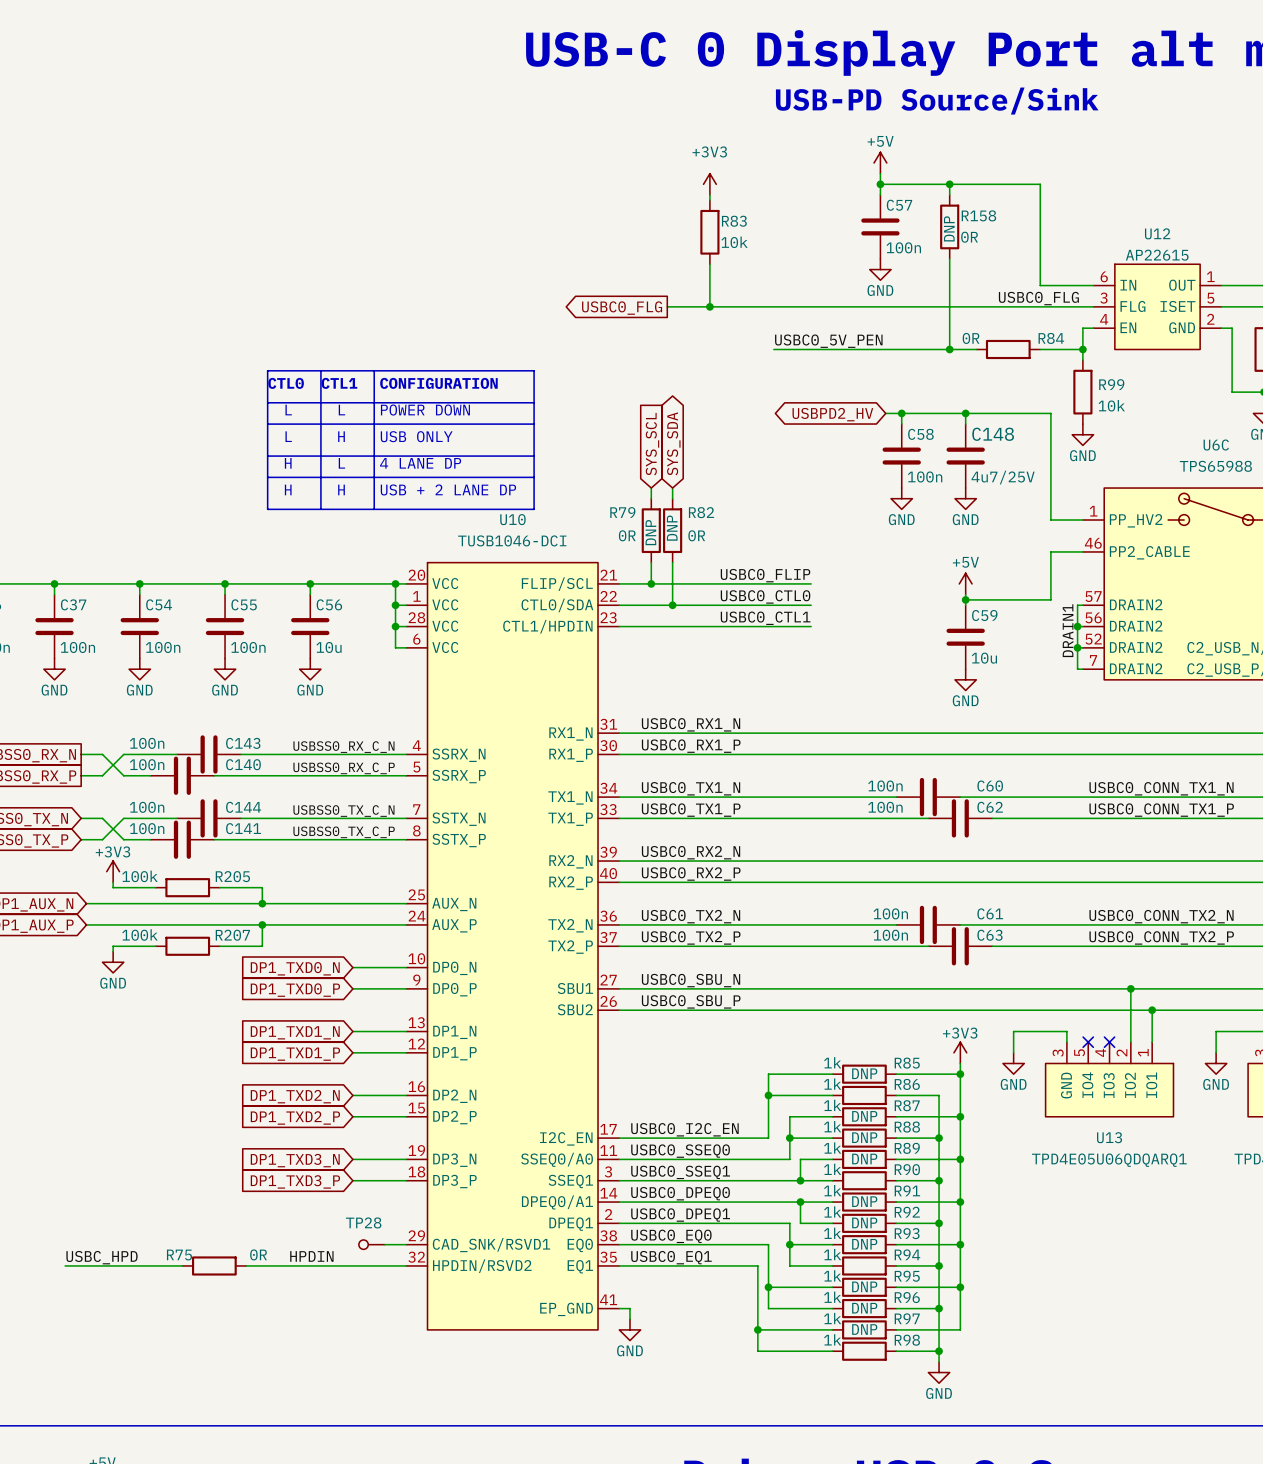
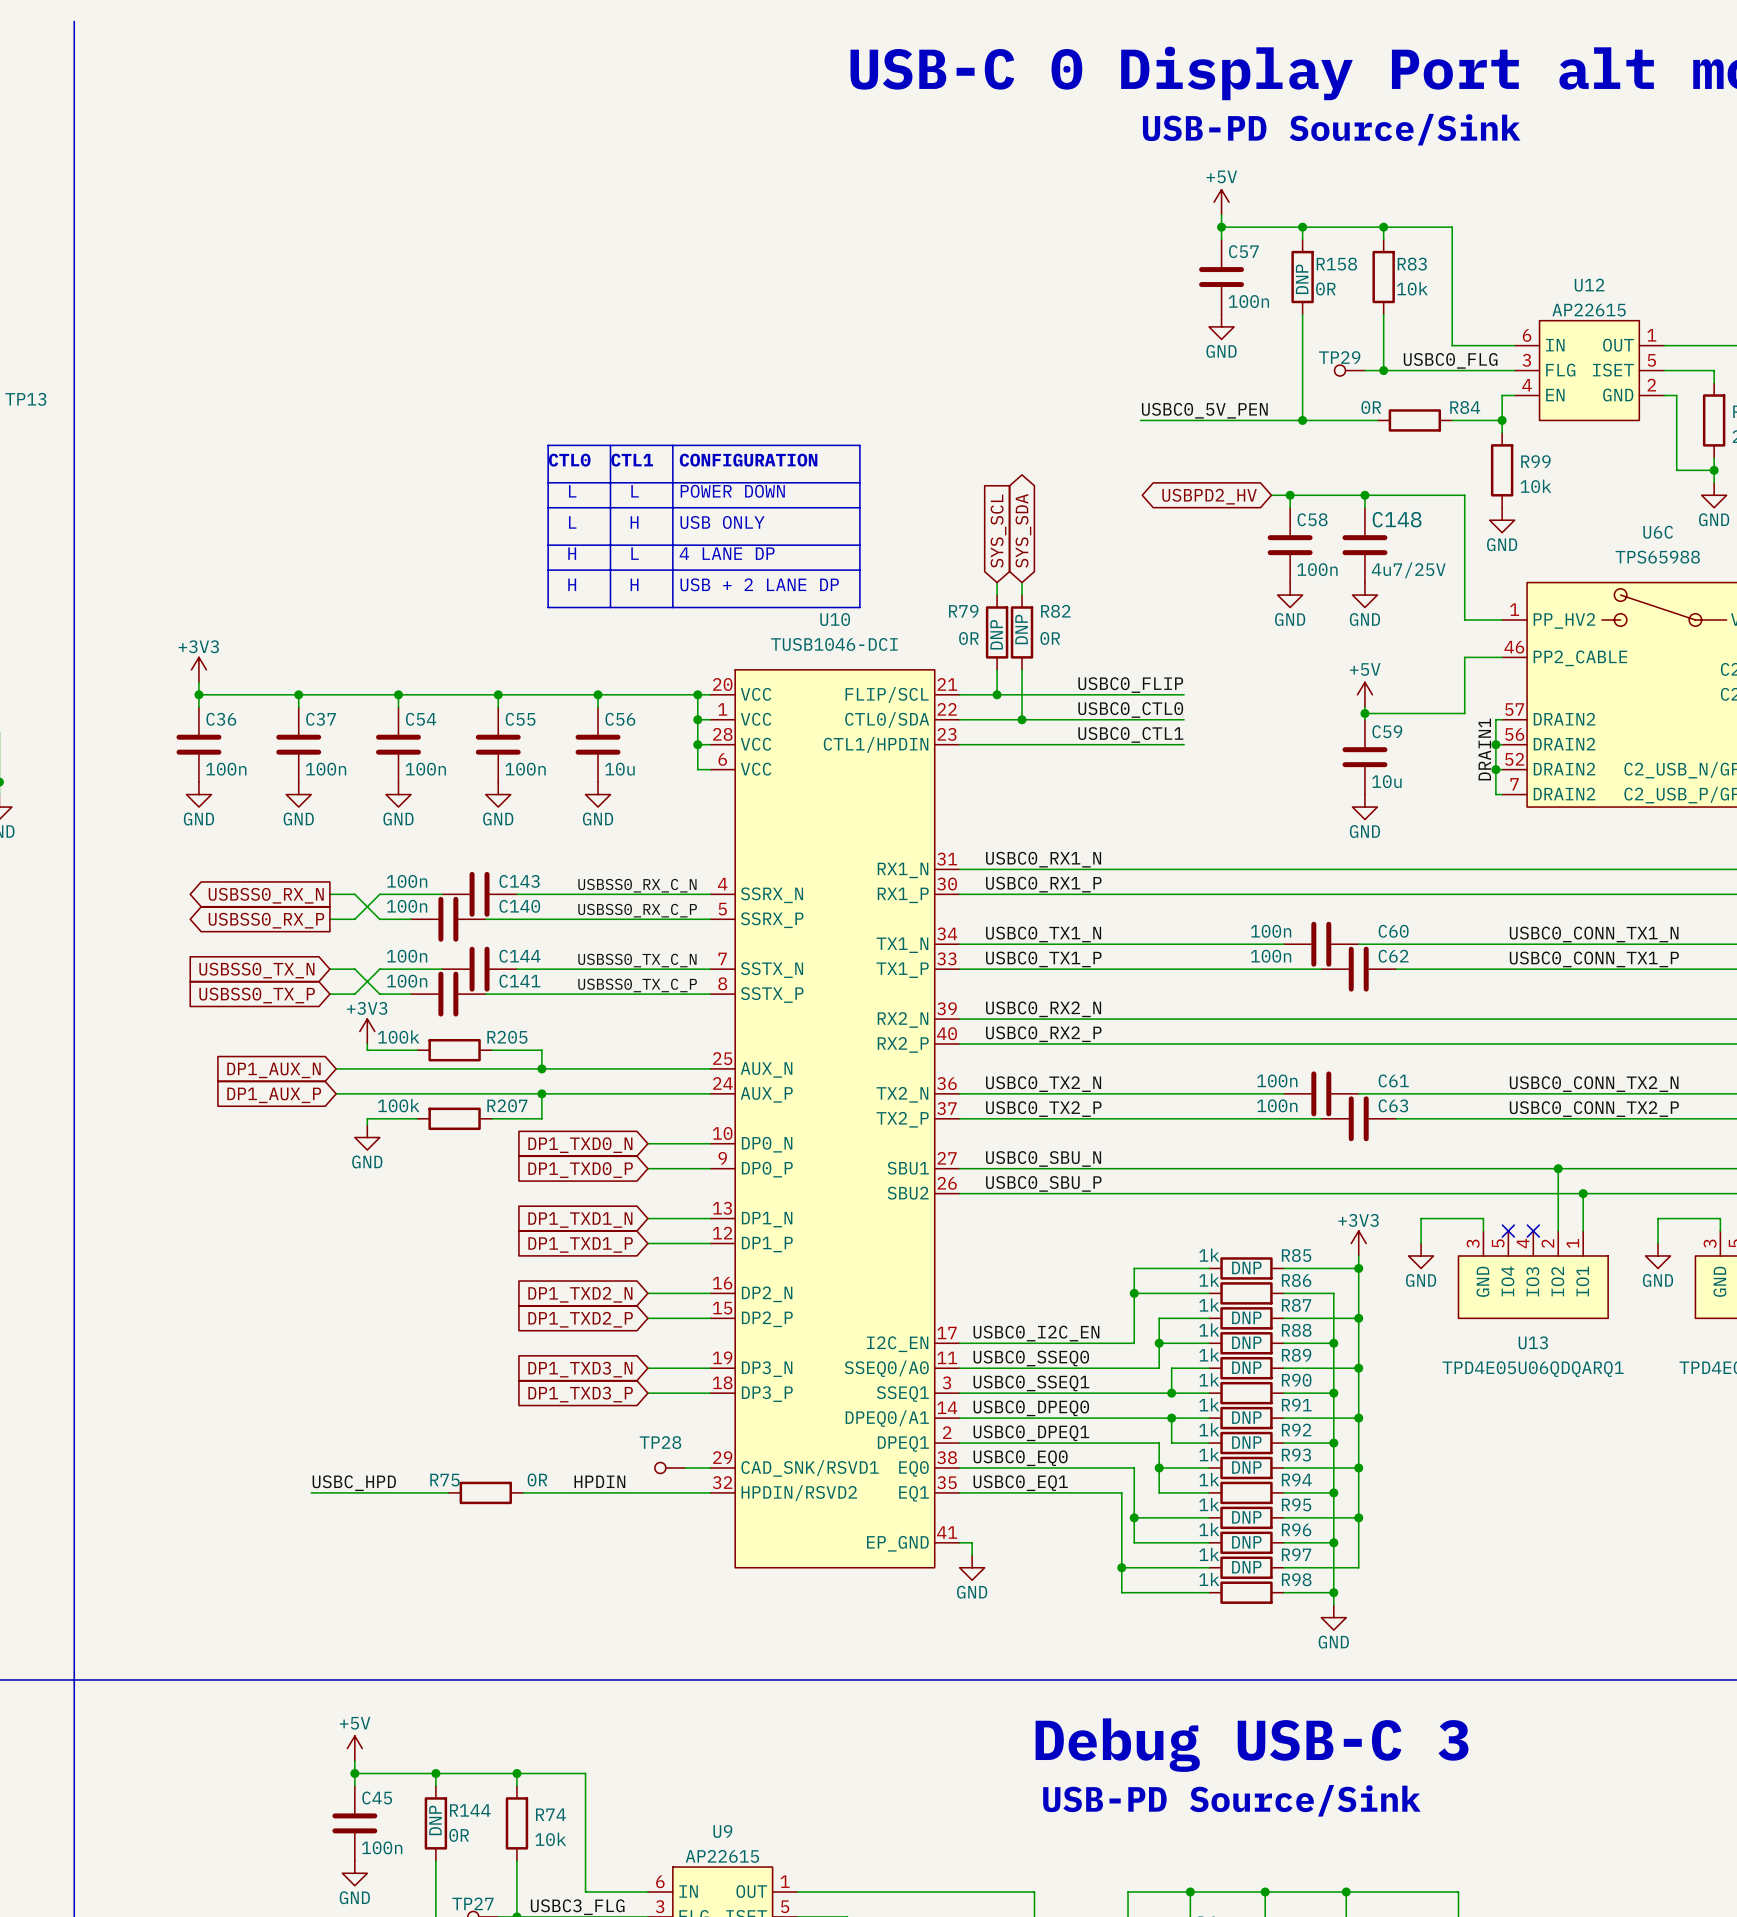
power symbol position: +5V (880, 163) -> +5V (1221, 202)
wire: (880, 173) (880, 194) -> (1221, 214) (1221, 239)
power symbol: +3V3 (709, 184) -> none
wire: none -> (1221, 227) (1265, 227)
junction: none -> (1221, 227)
junction: (880, 184) -> none
junction: none -> (1302, 227)
wire: (949, 184) (949, 194) -> (1302, 227) (1302, 239)
junction: (949, 184) -> none
wire: none -> (1383, 227) (1383, 239)
junction: none -> (1383, 227)
wire: (709, 194) (709, 200) -> none
C57 position: (880, 226) -> (1221, 277)
R158 position: (949, 226) -> (1302, 277)
R83 position: (709, 232) -> (1383, 277)
wire: (949, 258) (949, 349) -> (1302, 314) (1302, 420)
wire: none -> (1383, 314) (1383, 370)
wire: (709, 264) (709, 306) -> none
power symbol position: GND (880, 269) -> GND (1221, 326)
wire: (667, 306) (965, 306) -> none
junction: (709, 306) -> none
TP29: none -> (1349, 370)
junction: none -> (1383, 370)
global label: USBC0_FLG (622, 308) -> none
junction: none -> (1302, 420)
junction: (949, 349) -> none

